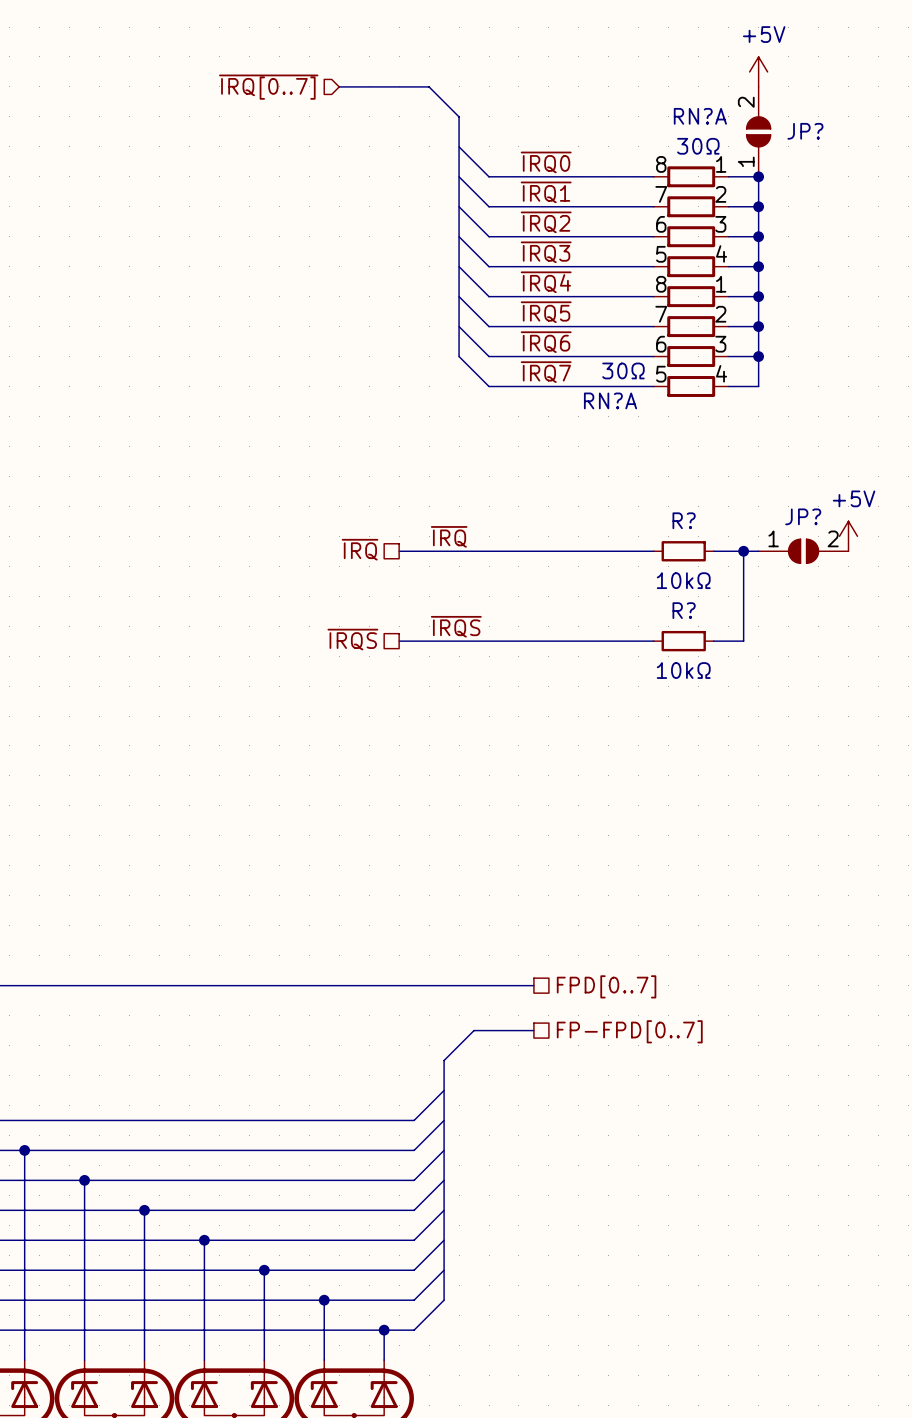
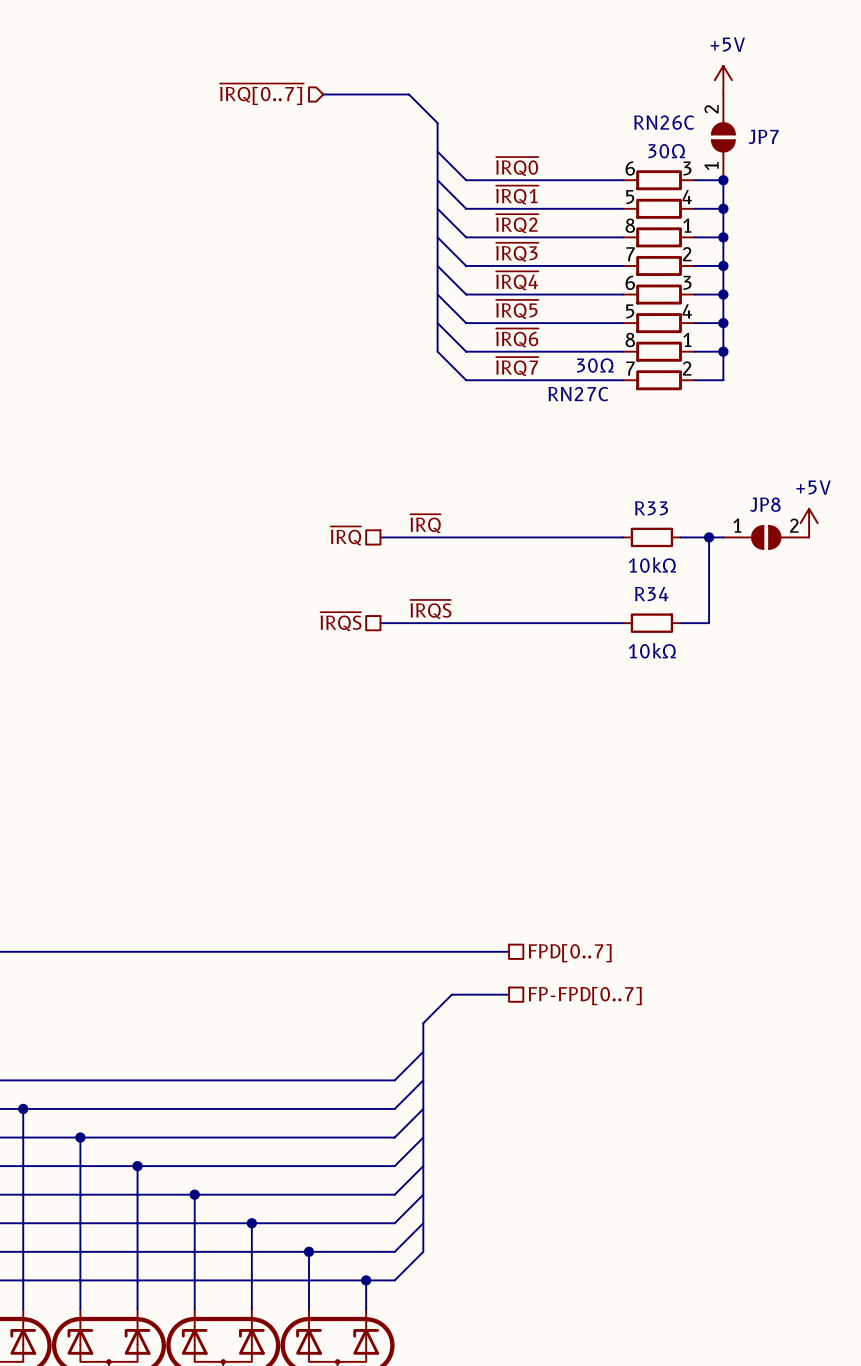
RN?A name: RN?A (700, 116) -> RN26C (664, 122)
JP? name: JP? (805, 131) -> JP7 (763, 136)
RN?A pin number: 8 (661, 164) -> 6 (630, 168)
RN?A pin number: 1 (721, 164) -> 3 (687, 168)
part pin number: 7 (661, 194) -> 5 (630, 197)
part pin number: 2 (720, 194) -> 4 (687, 197)
part pin number: 6 (661, 224) -> 8 (630, 225)
part pin number: 3 (720, 224) -> 1 (687, 225)
part pin number: 4 (721, 253) -> 2 (687, 254)
part pin number: 5 (661, 254) -> 7 (630, 254)
RN?A pin number: 8 (661, 284) -> 6 (630, 282)
RN?A pin number: 1 (721, 284) -> 3 (687, 282)
part pin number: 7 (661, 314) -> 5 (630, 311)
part pin number: 2 (720, 314) -> 4 (687, 311)
part pin number: 6 (661, 344) -> 8 (630, 339)
part pin number: 3 (720, 344) -> 1 (687, 339)
part pin number: 4 (721, 373) -> 2 (687, 368)
part pin number: 5 (661, 374) -> 7 (630, 368)
RN?A name: RN?A (610, 400) -> RN27C (578, 394)
JP? name: JP? (803, 516) -> JP8 (765, 504)
R? name: R? (684, 520) -> R33 (651, 508)
R? name: R? (684, 610) -> R34 (651, 594)

